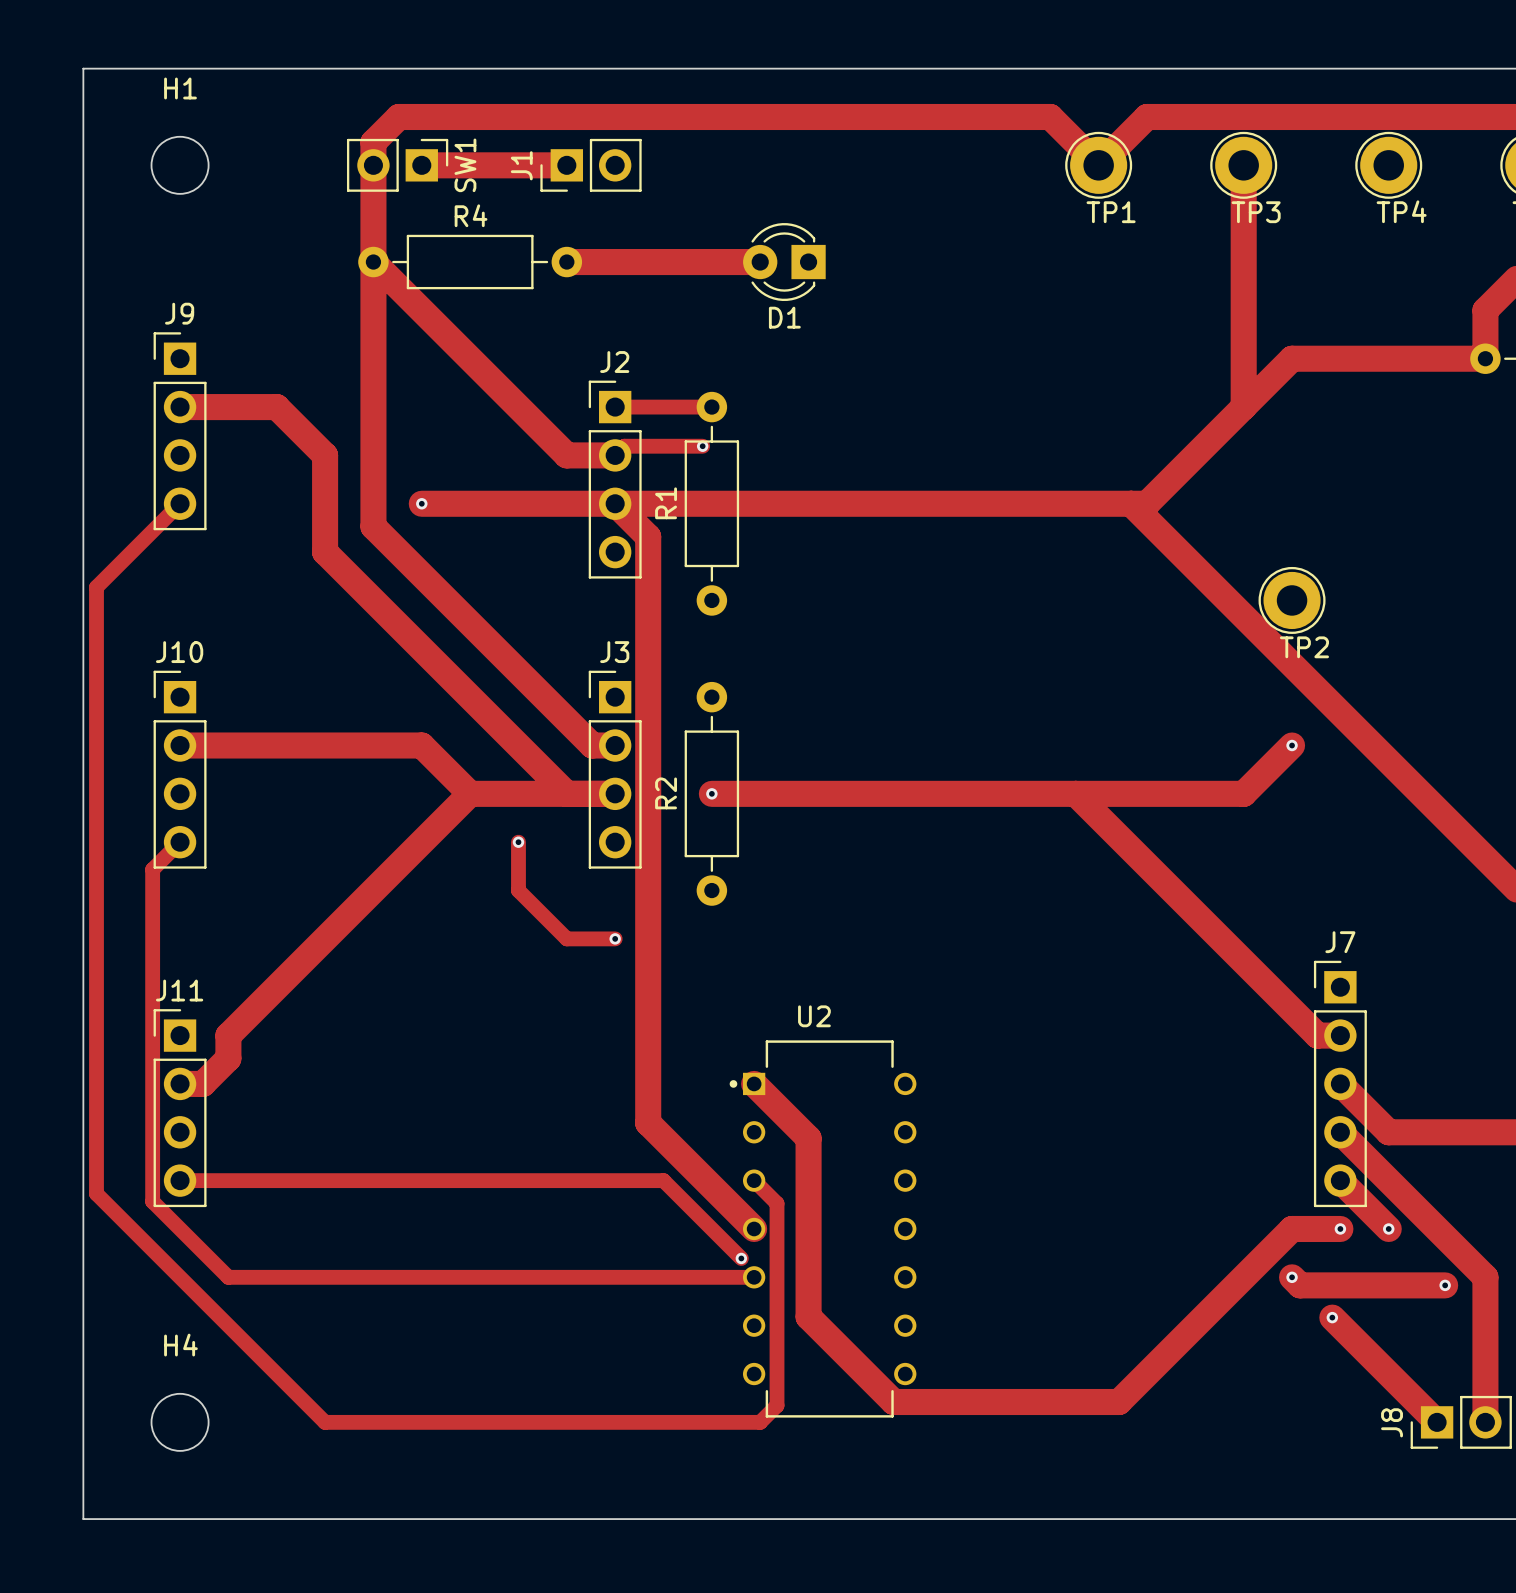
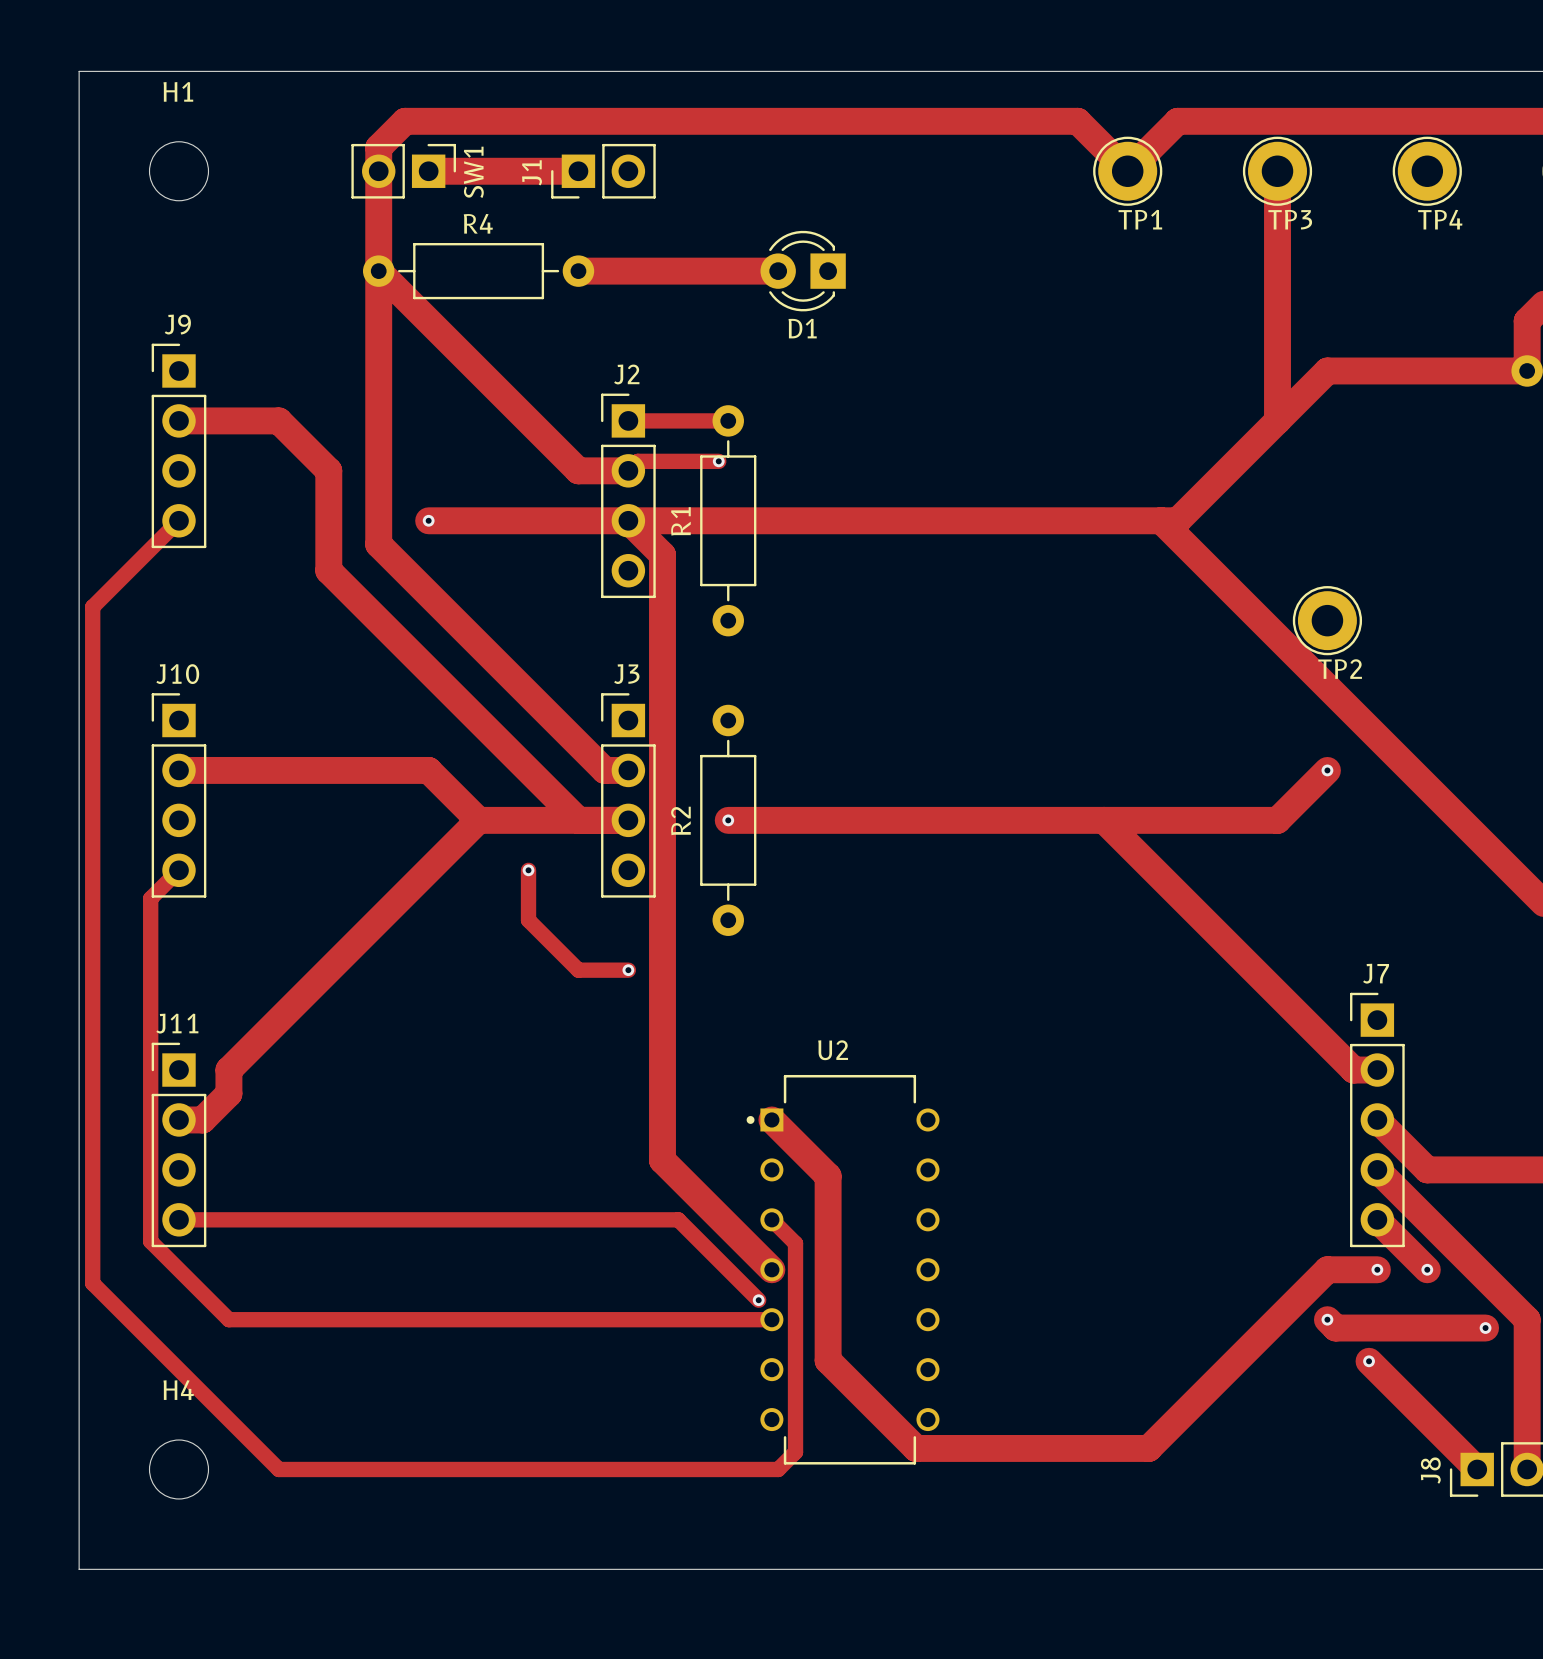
track: (96, 1193) (325, 1422) -> (92, 1233) (92, 1283) (278, 1469) (328, 1469)

